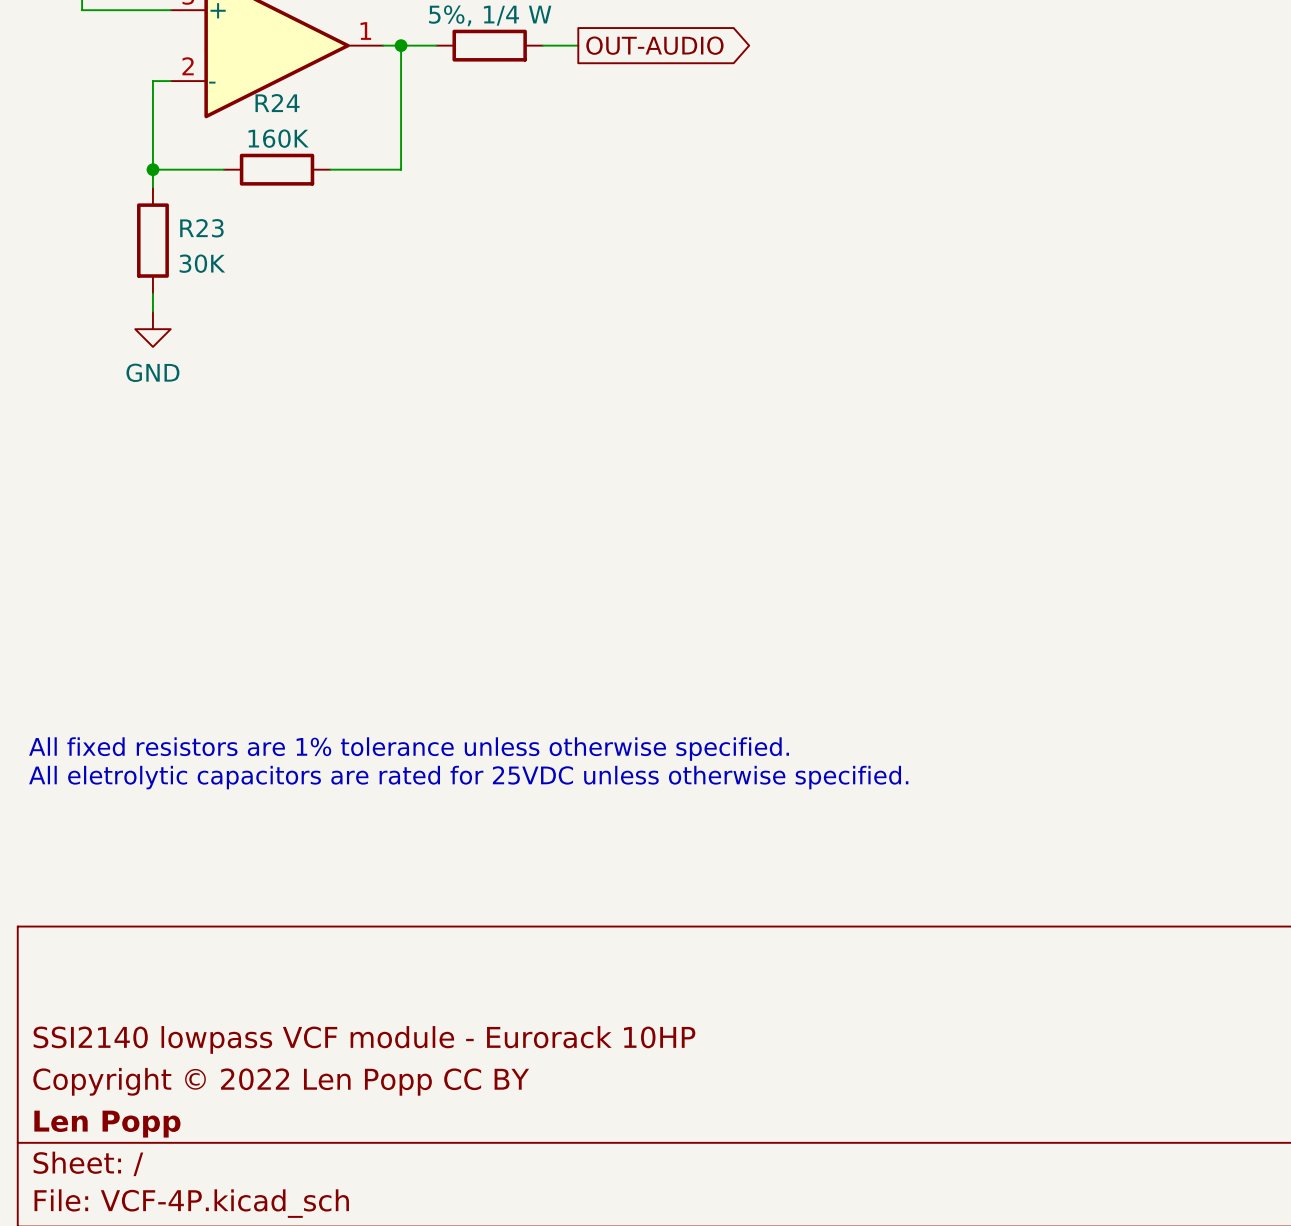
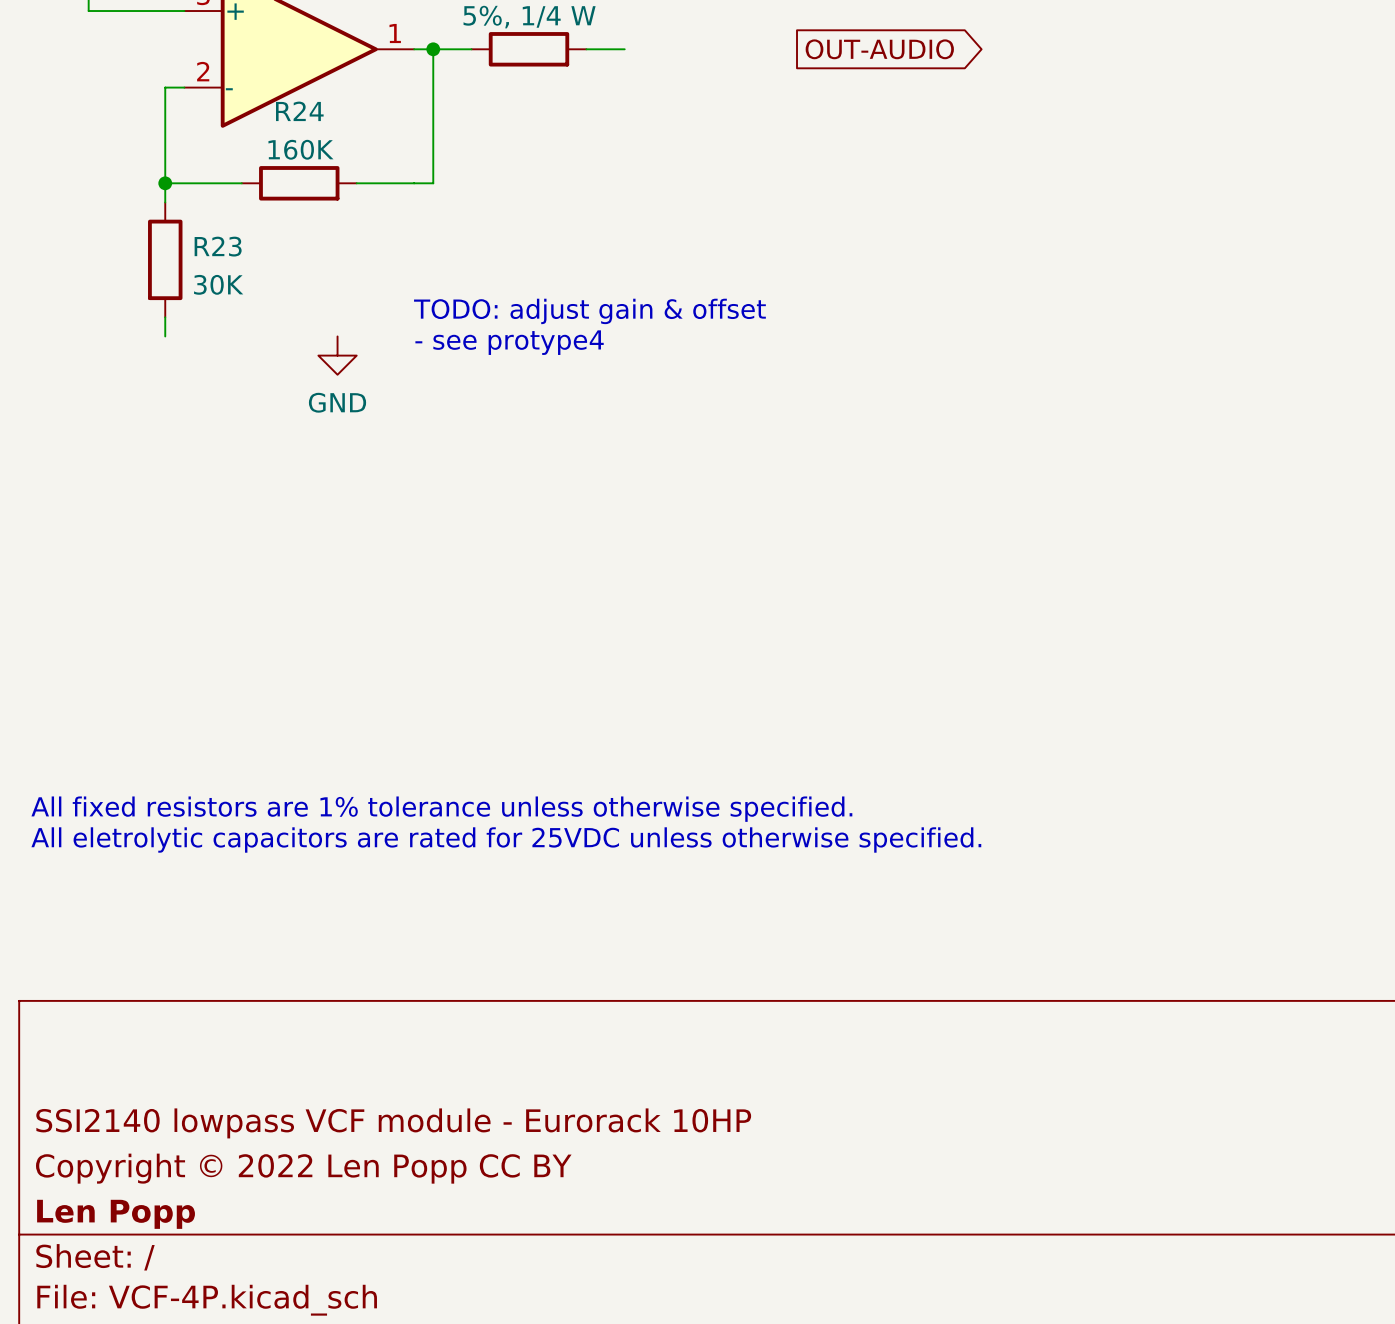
global label position: OUT-AUDIO (654, 45) -> OUT-AUDIO (879, 49)
text: none -> TODO: adjust gain & offset (589, 311)
text: none -> - see protype4 (509, 342)
power symbol position: GND (152, 329) -> GND (337, 355)

